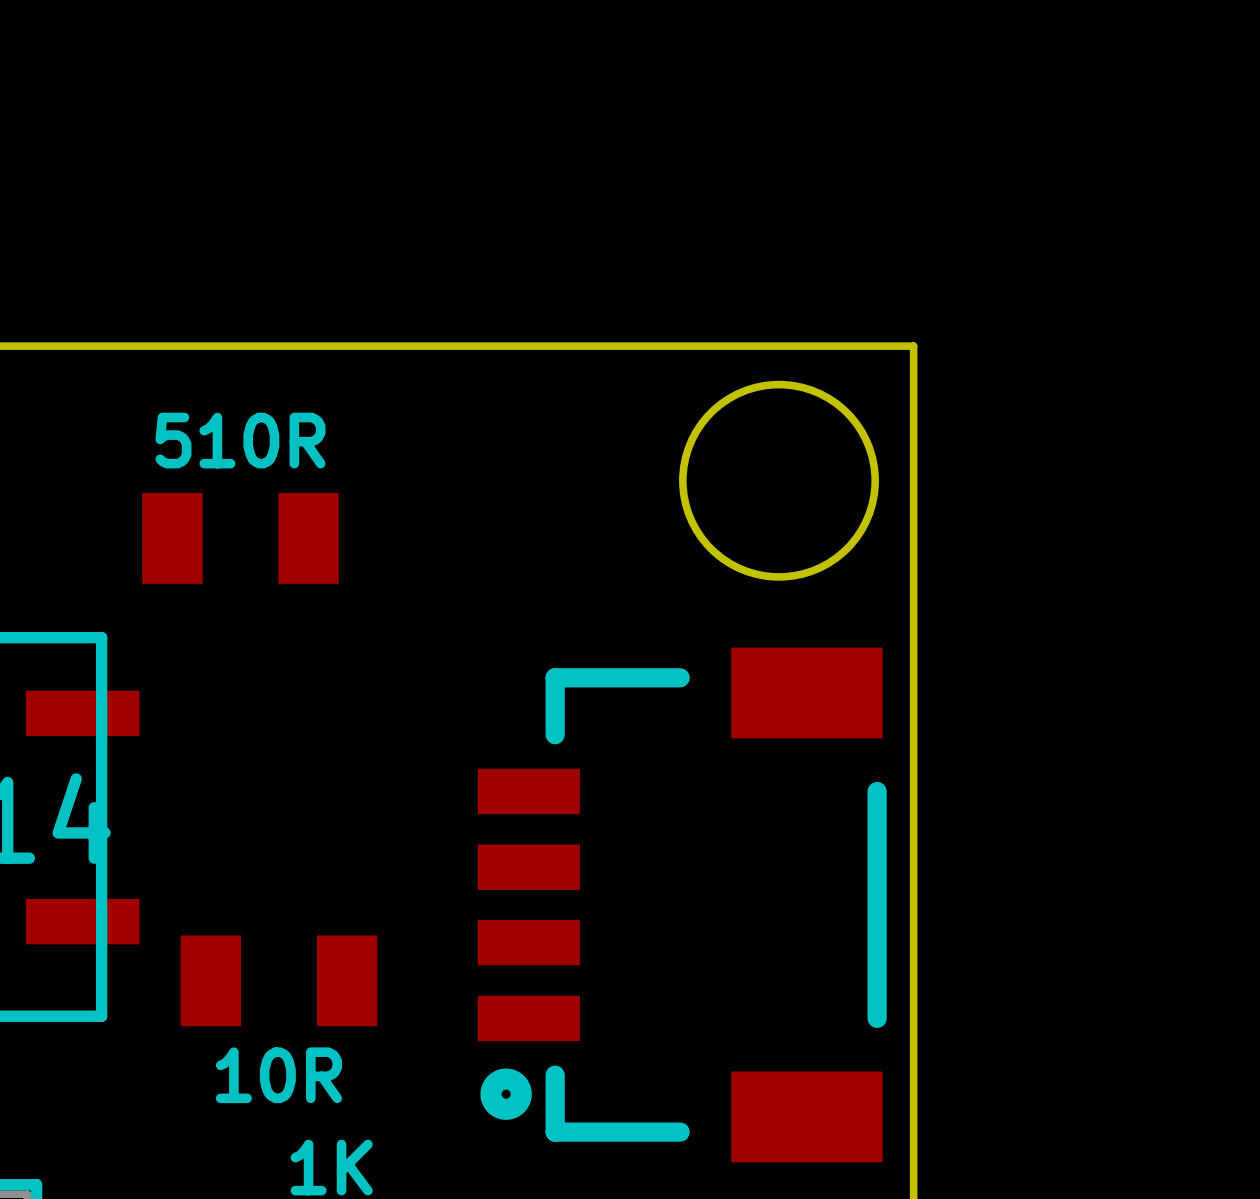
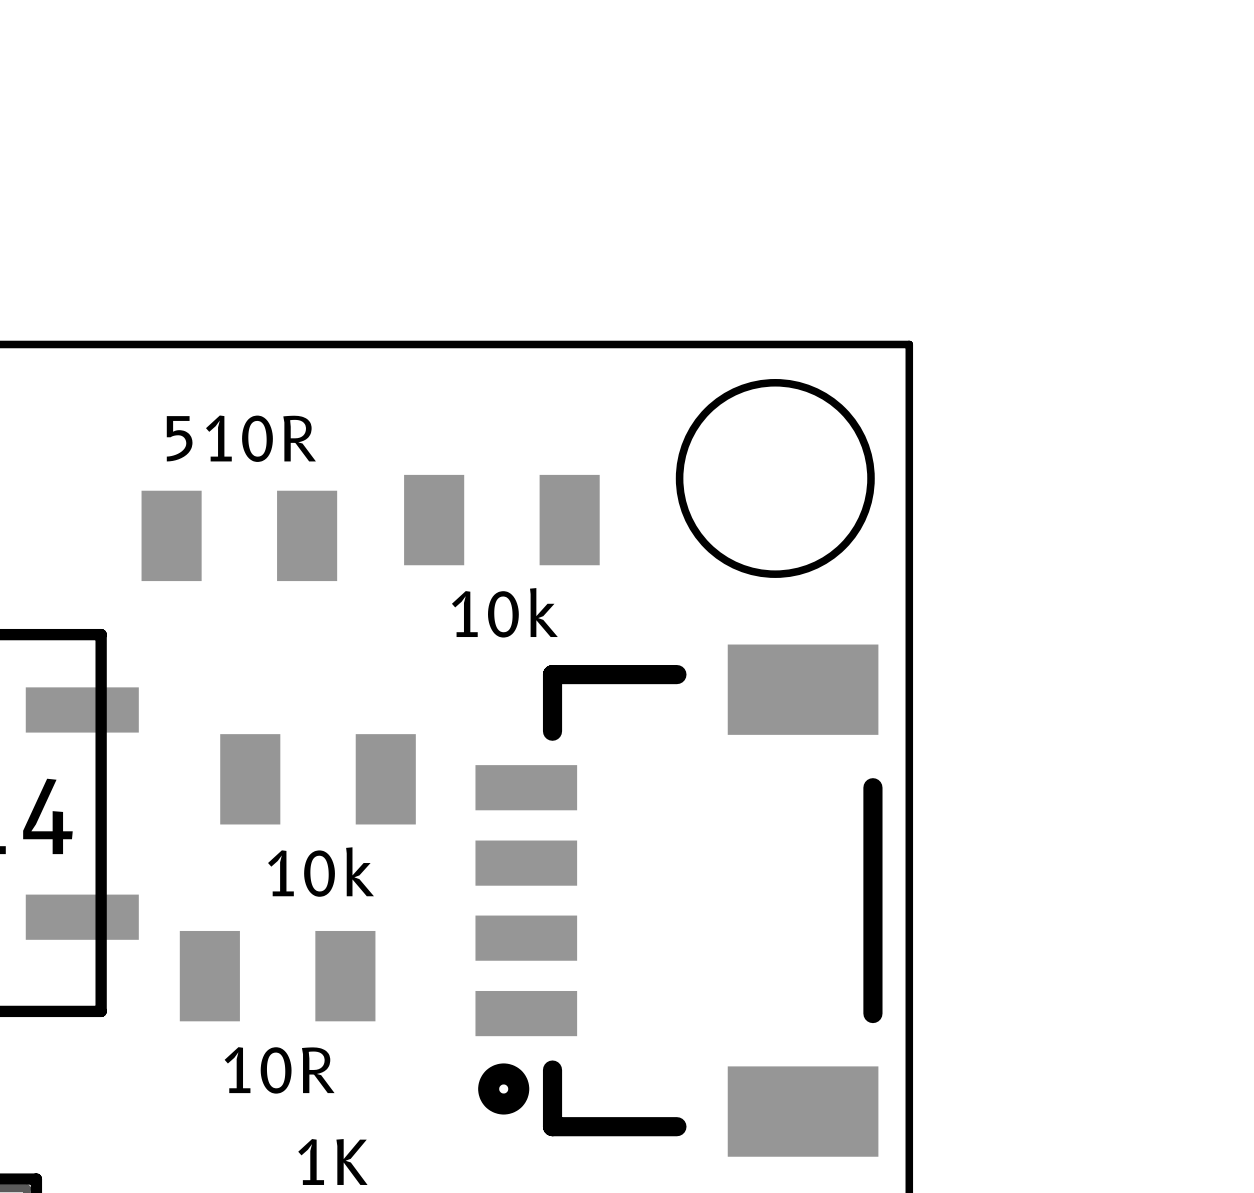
part: none -> 10k (501, 520)
part: none -> 10k (318, 779)

